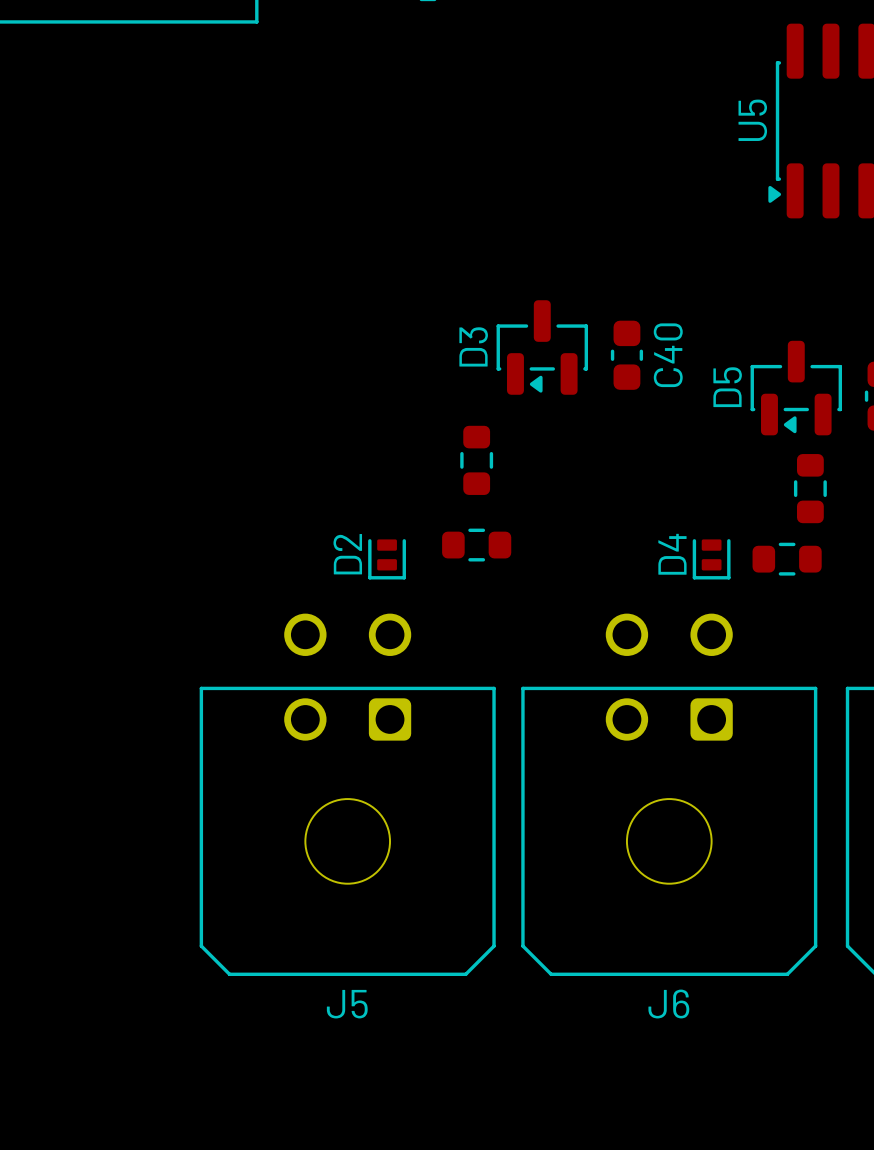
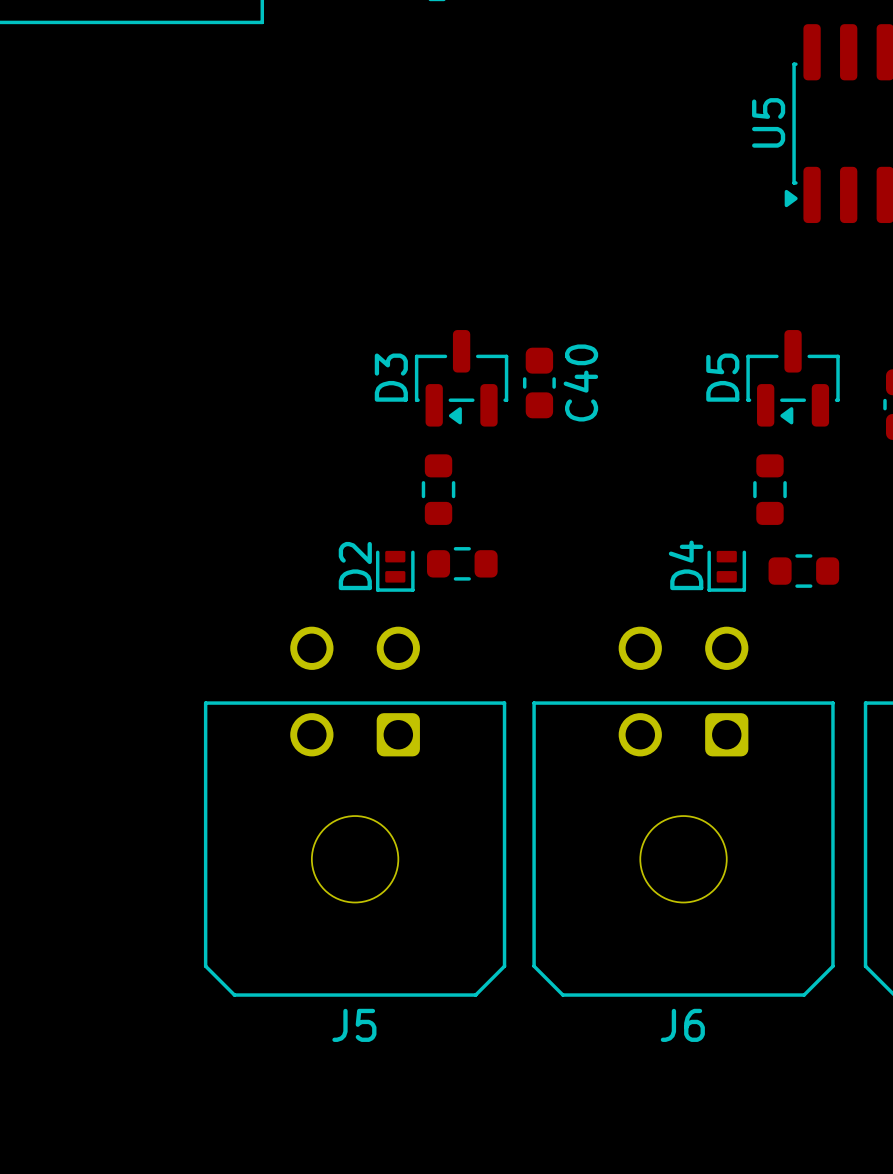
D3 position: (542, 347) -> (461, 378)
C40 position: (626, 355) -> (539, 382)
D5 position: (796, 388) -> (793, 378)
part position: (476, 460) -> (438, 489)
part position: (810, 488) -> (769, 489)
part position: (476, 545) -> (462, 563)

